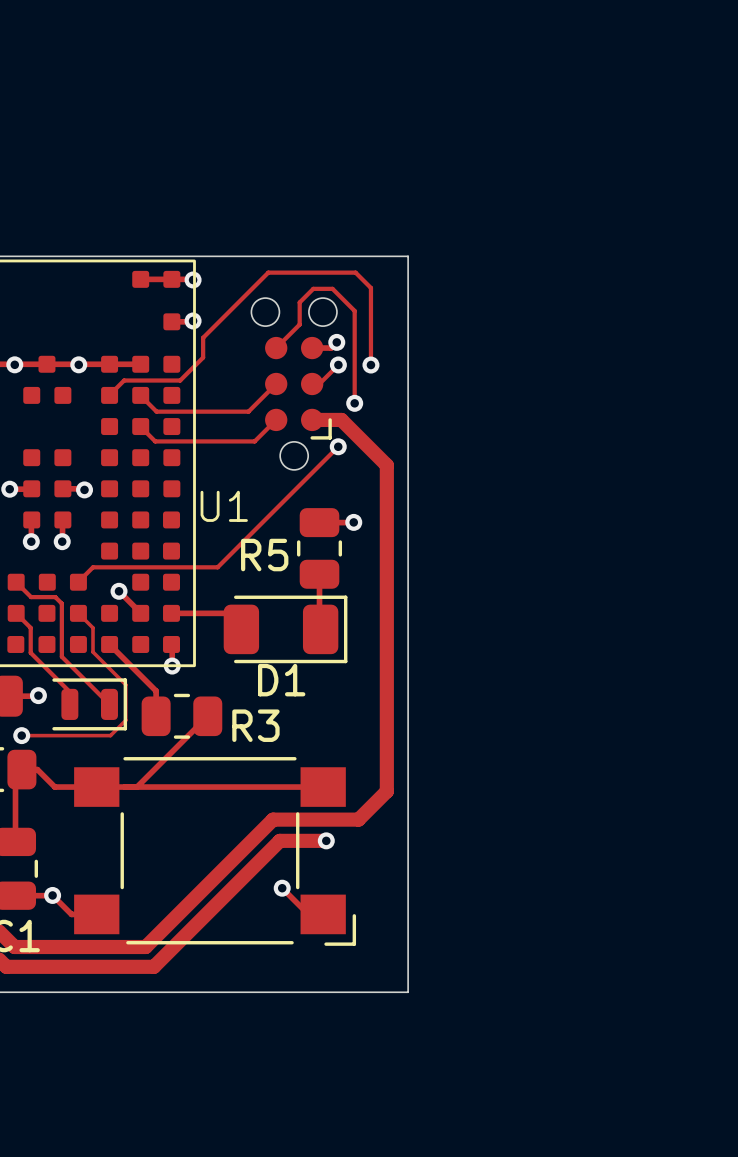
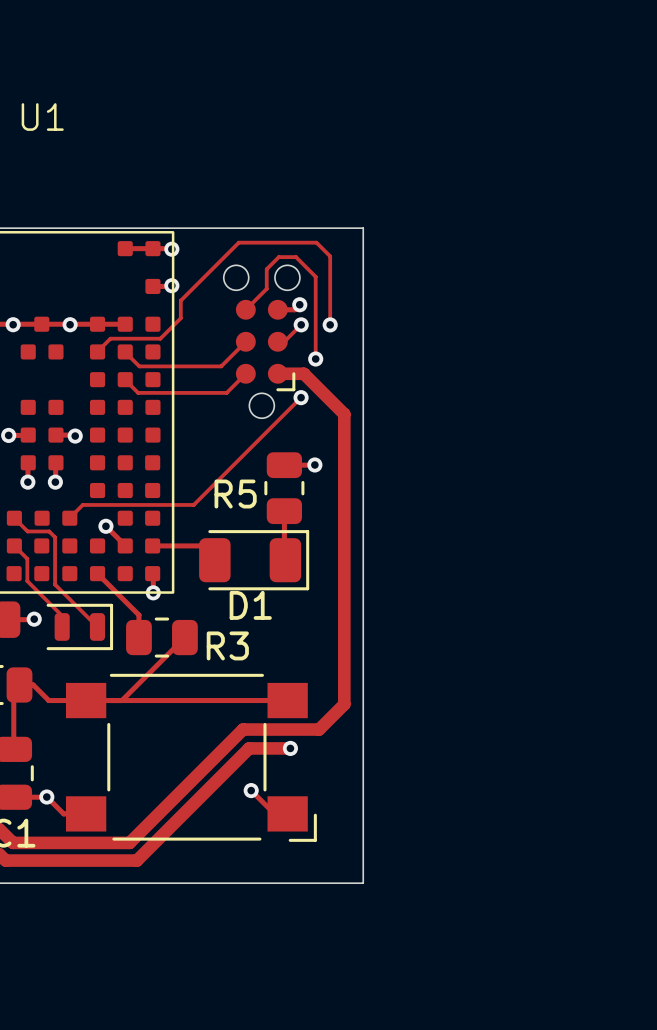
U1 name position: U1 (224, 506) -> U1 (42, 117)
track: (78, 613) (93, 627) (93, 652) (125, 684) (125, 720) (110, 735) (21, 735) -> none
via: (21, 735) -> none

